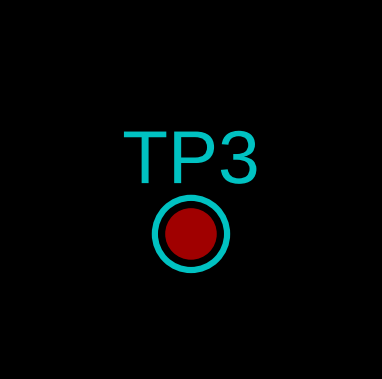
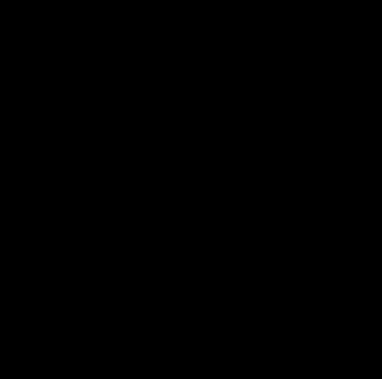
TP3: (190, 233) -> none

